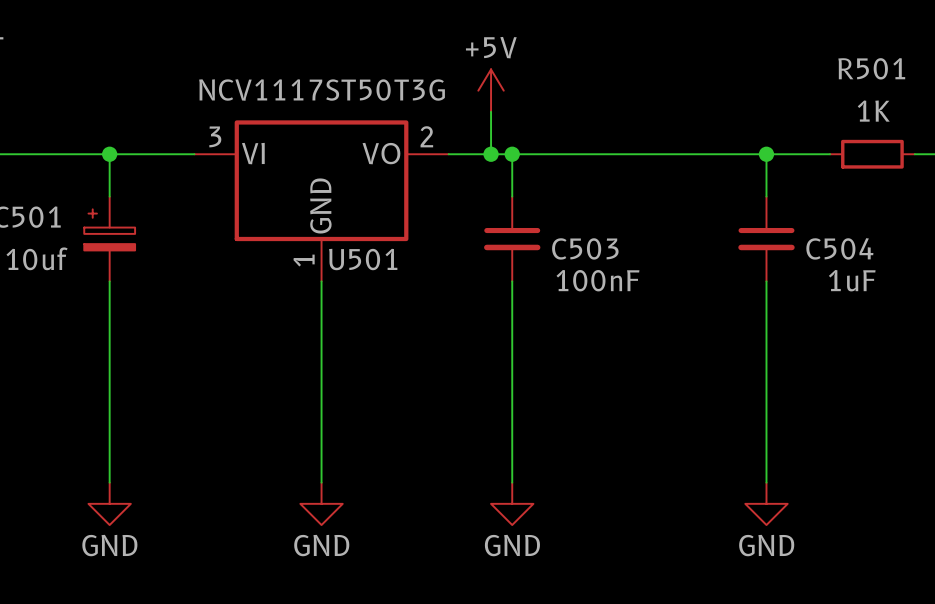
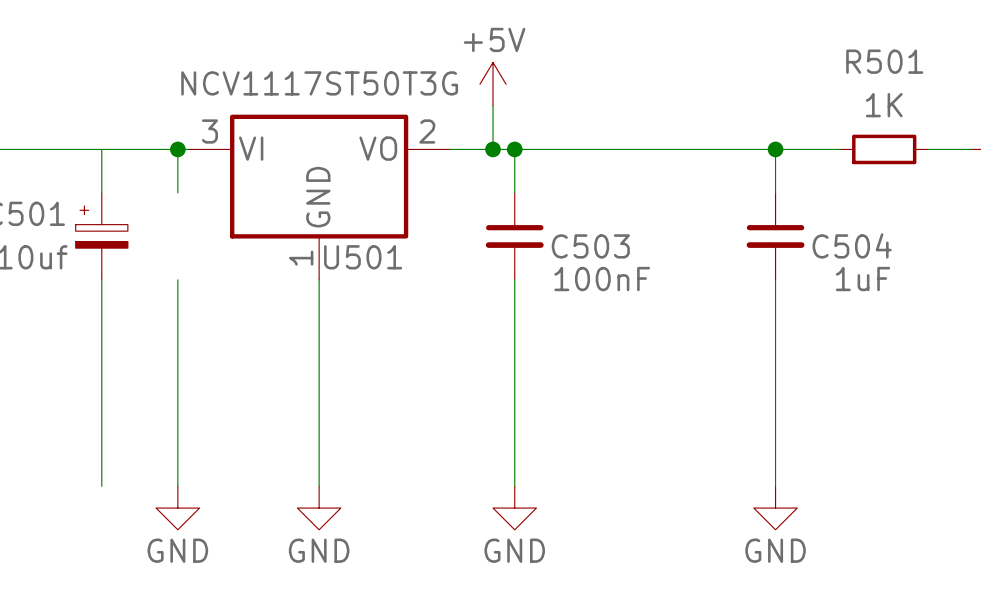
junction position: (109, 154) -> (177, 149)
wire: none -> (177, 149) (177, 192)
wire: none -> (177, 279) (177, 486)
power symbol position: GND (109, 503) -> GND (177, 508)

